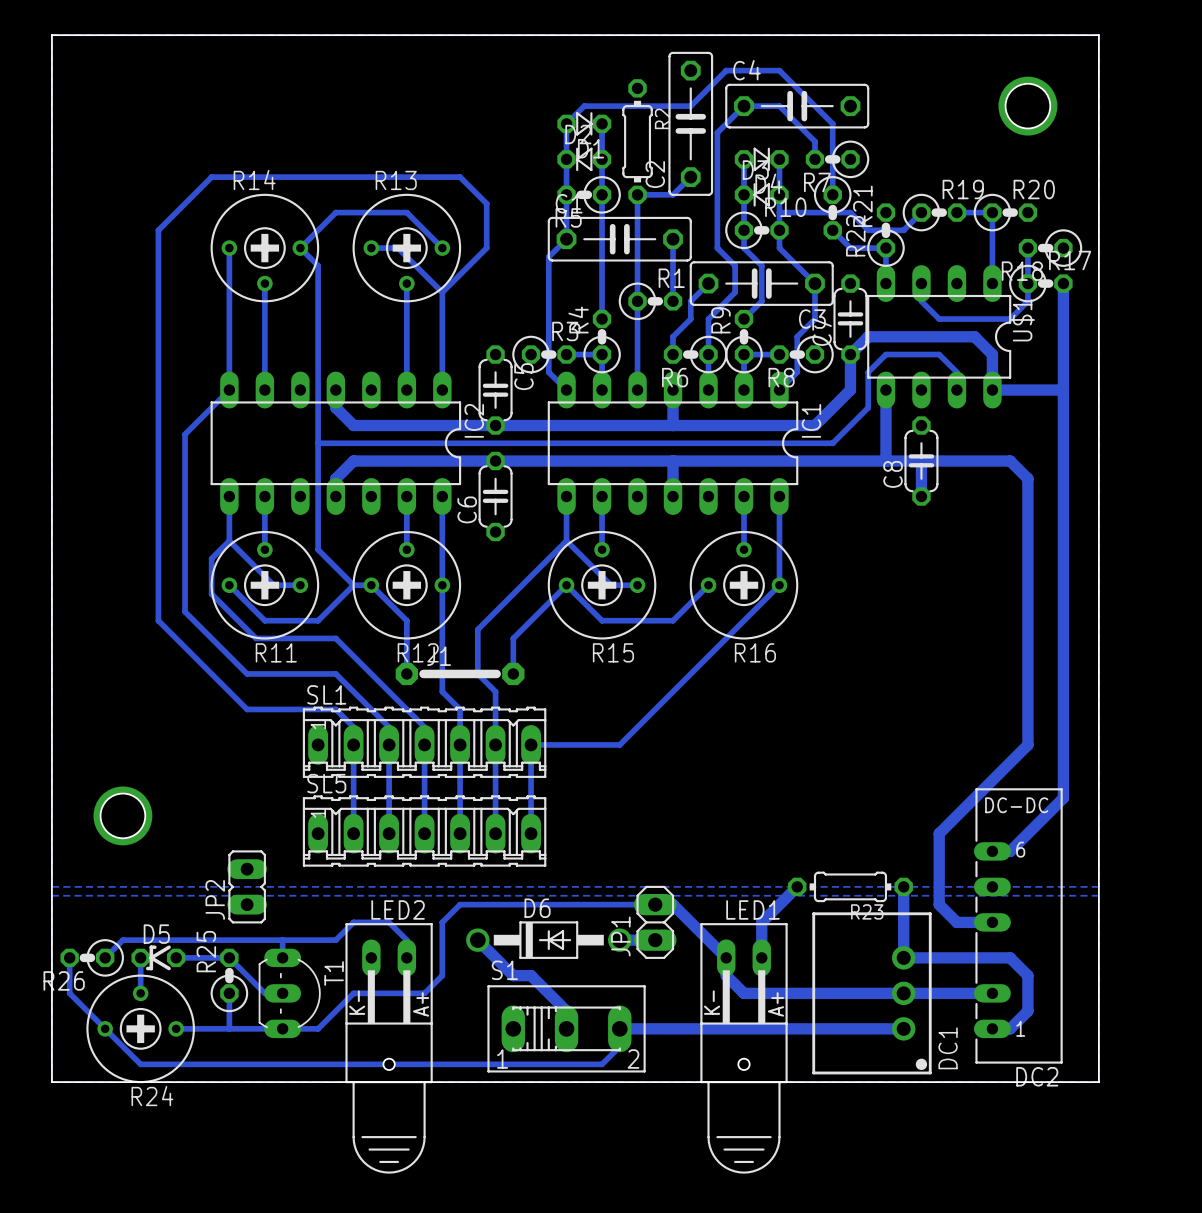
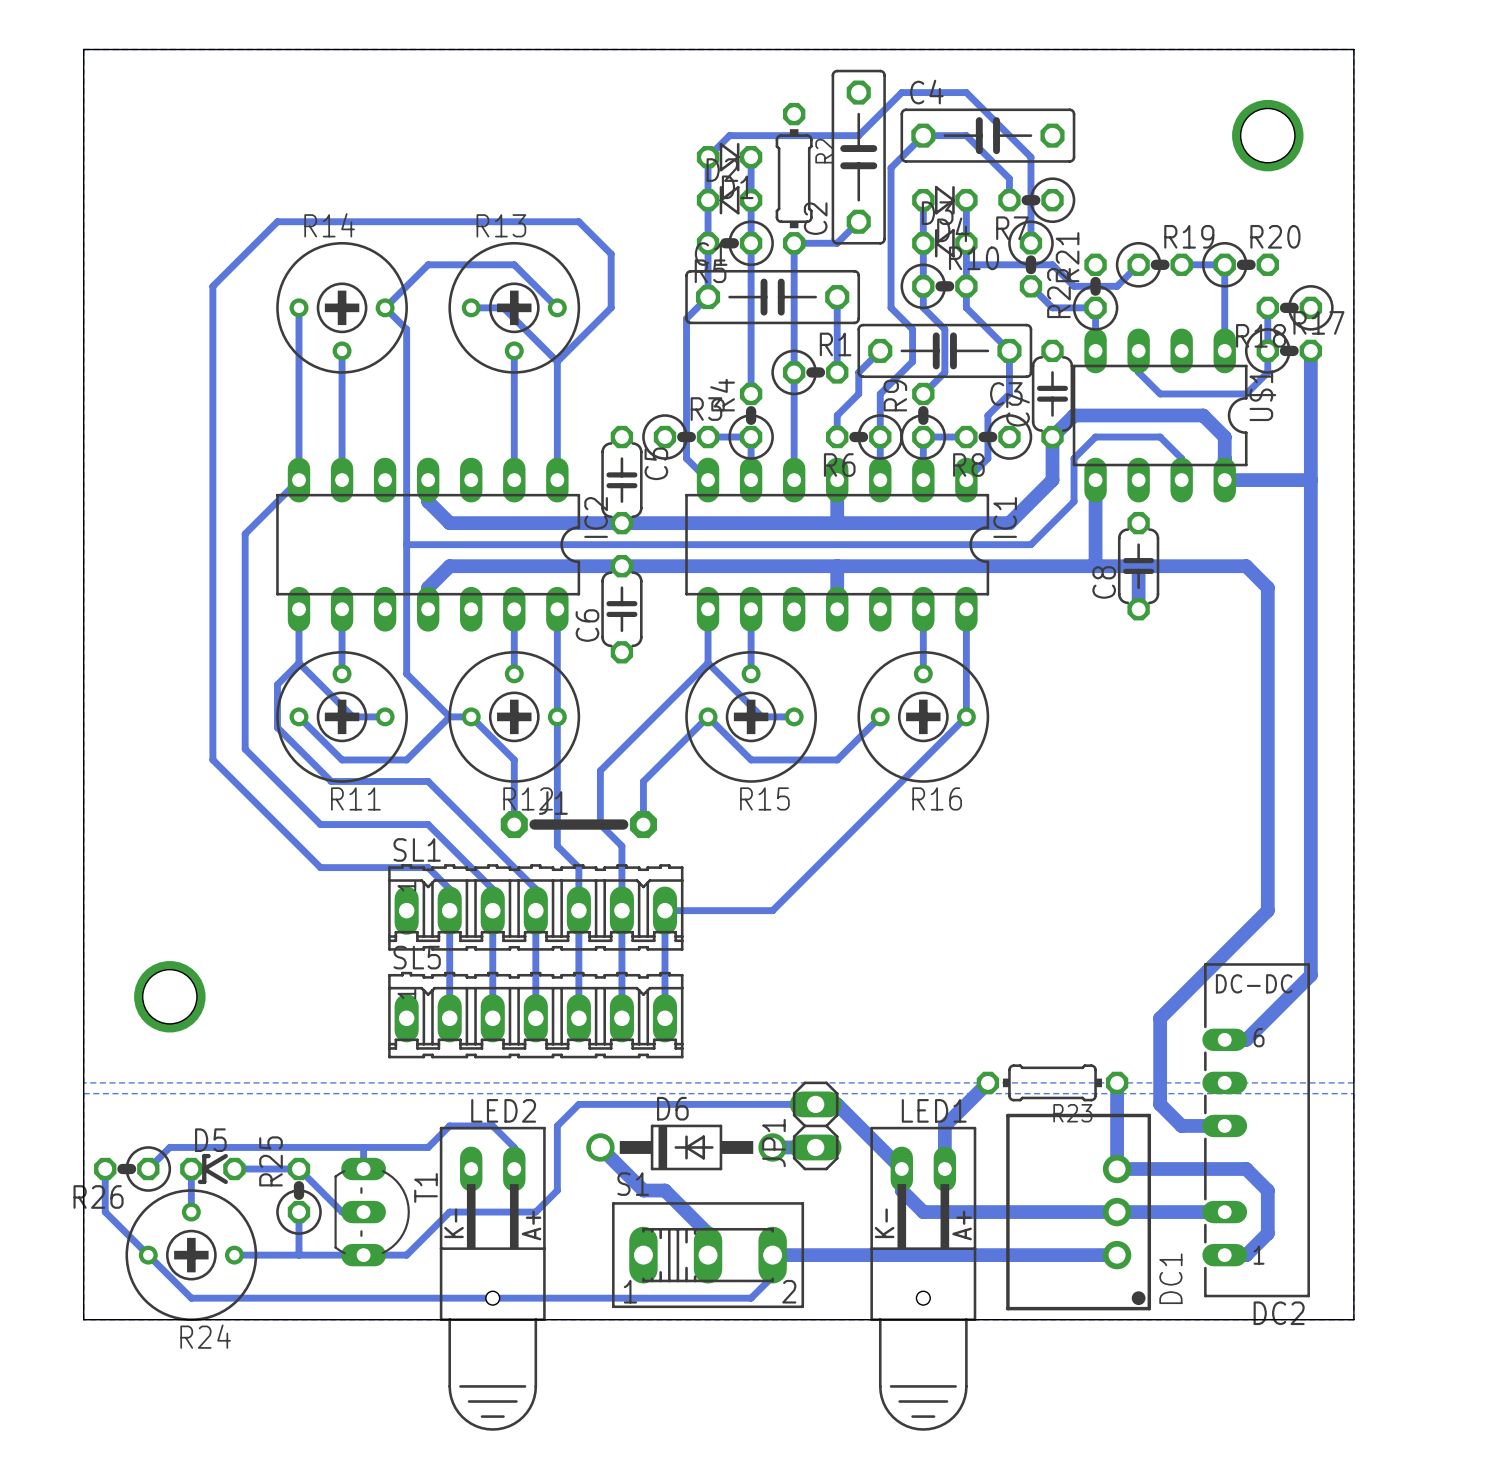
JP2: (247, 886) -> none

